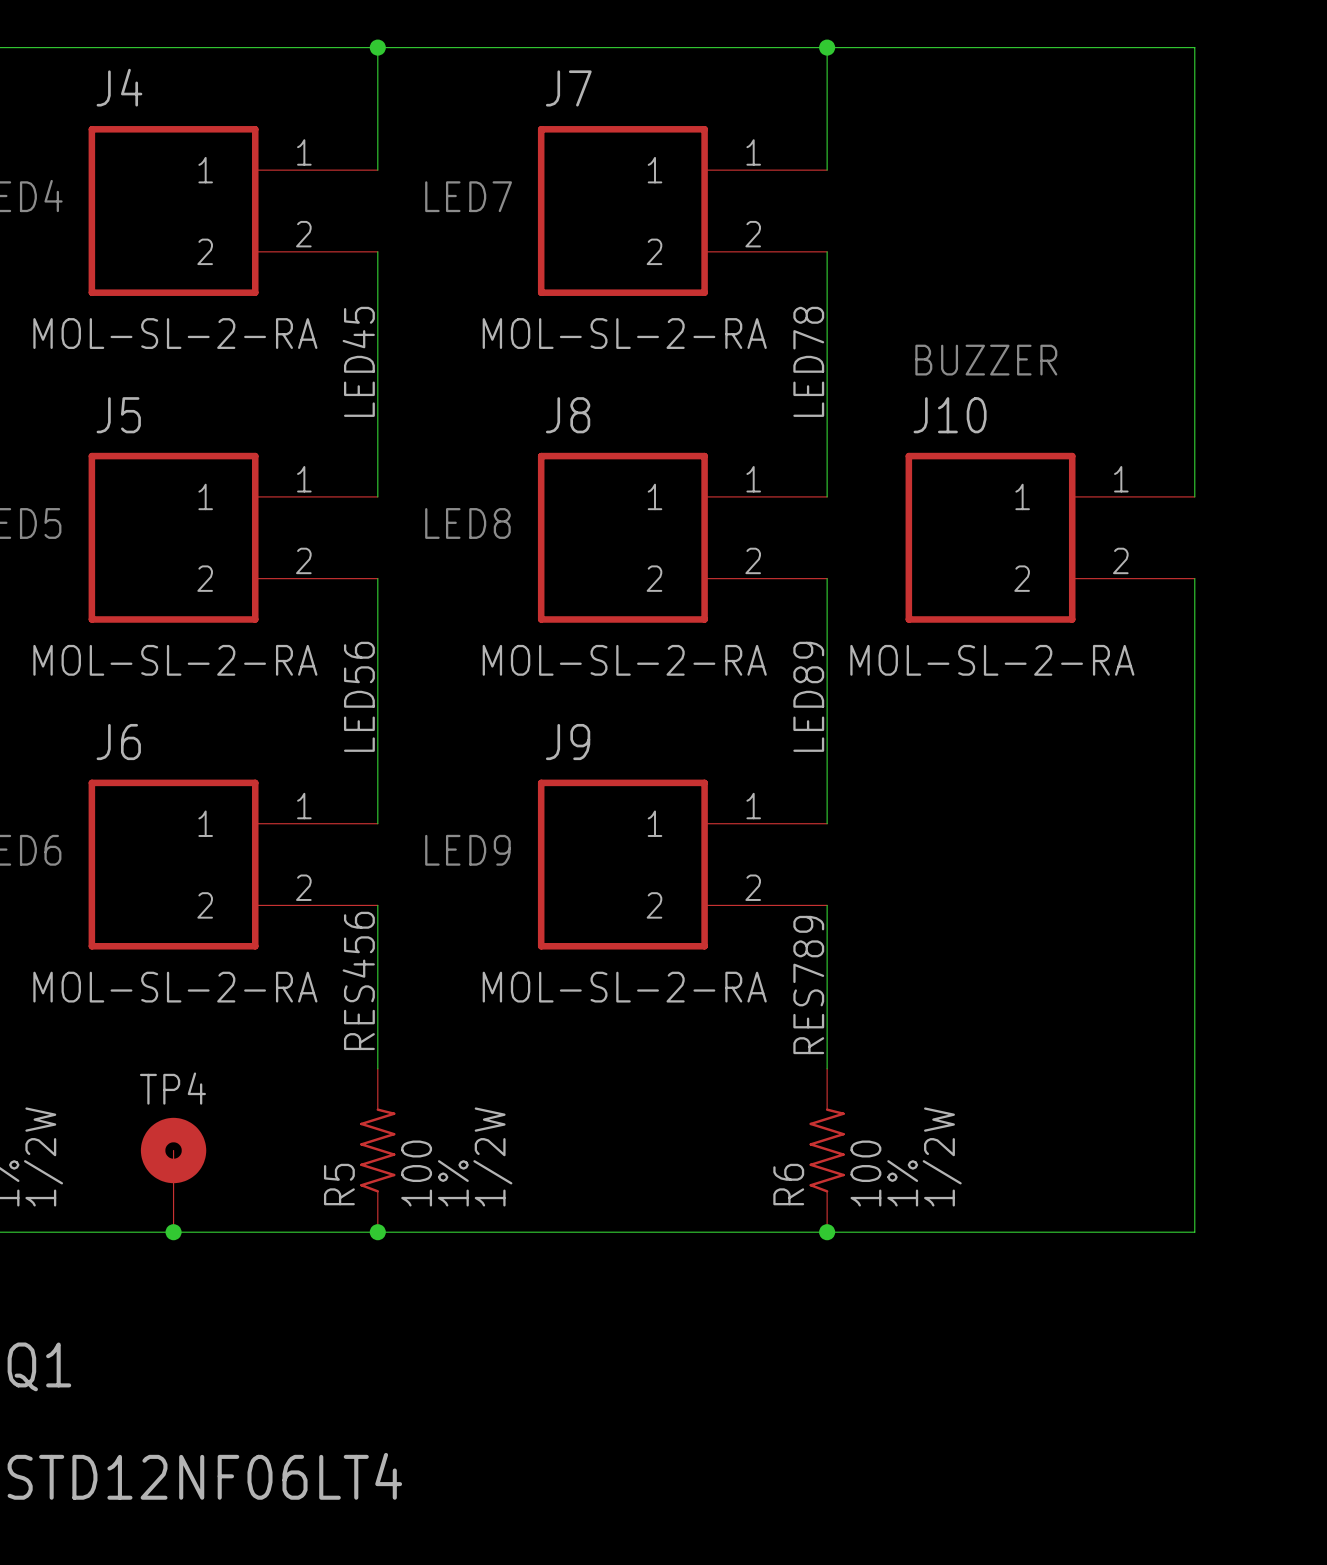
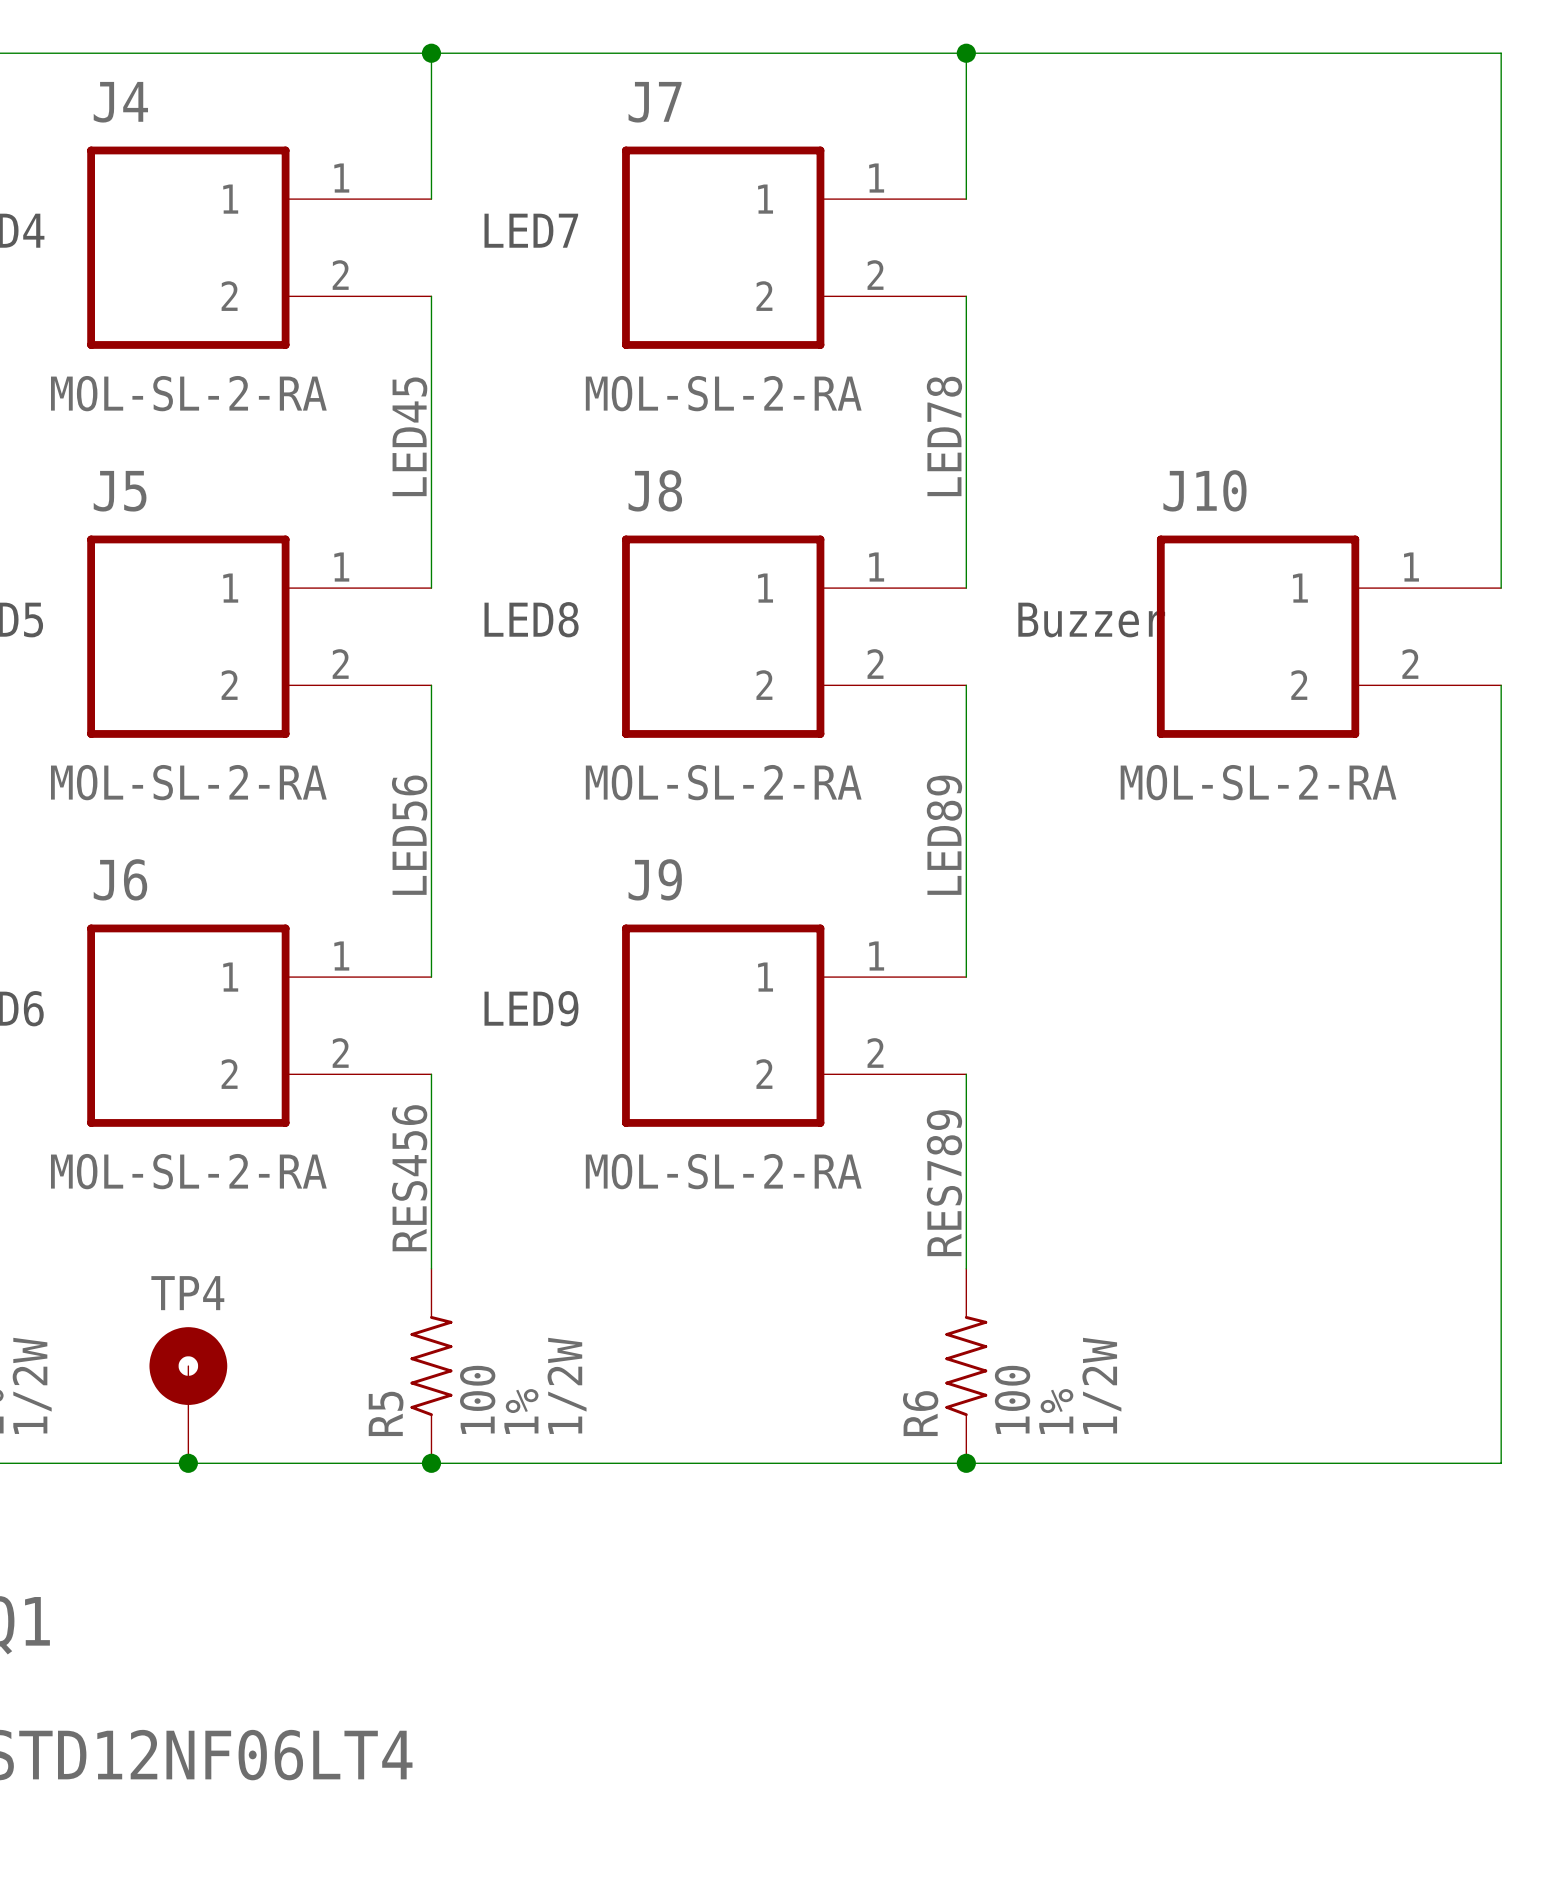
wire: (1194, 47) (1194, 496) -> (1403, 53) (1501, 53) (1501, 588)
text: BUZZER (986, 360) -> none
text: none -> Buzzer (1091, 620)
J10 position: (1050, 537) -> (1329, 636)
wire: (1194, 578) (1194, 1232) -> (1501, 685) (1501, 1463) (1403, 1463)

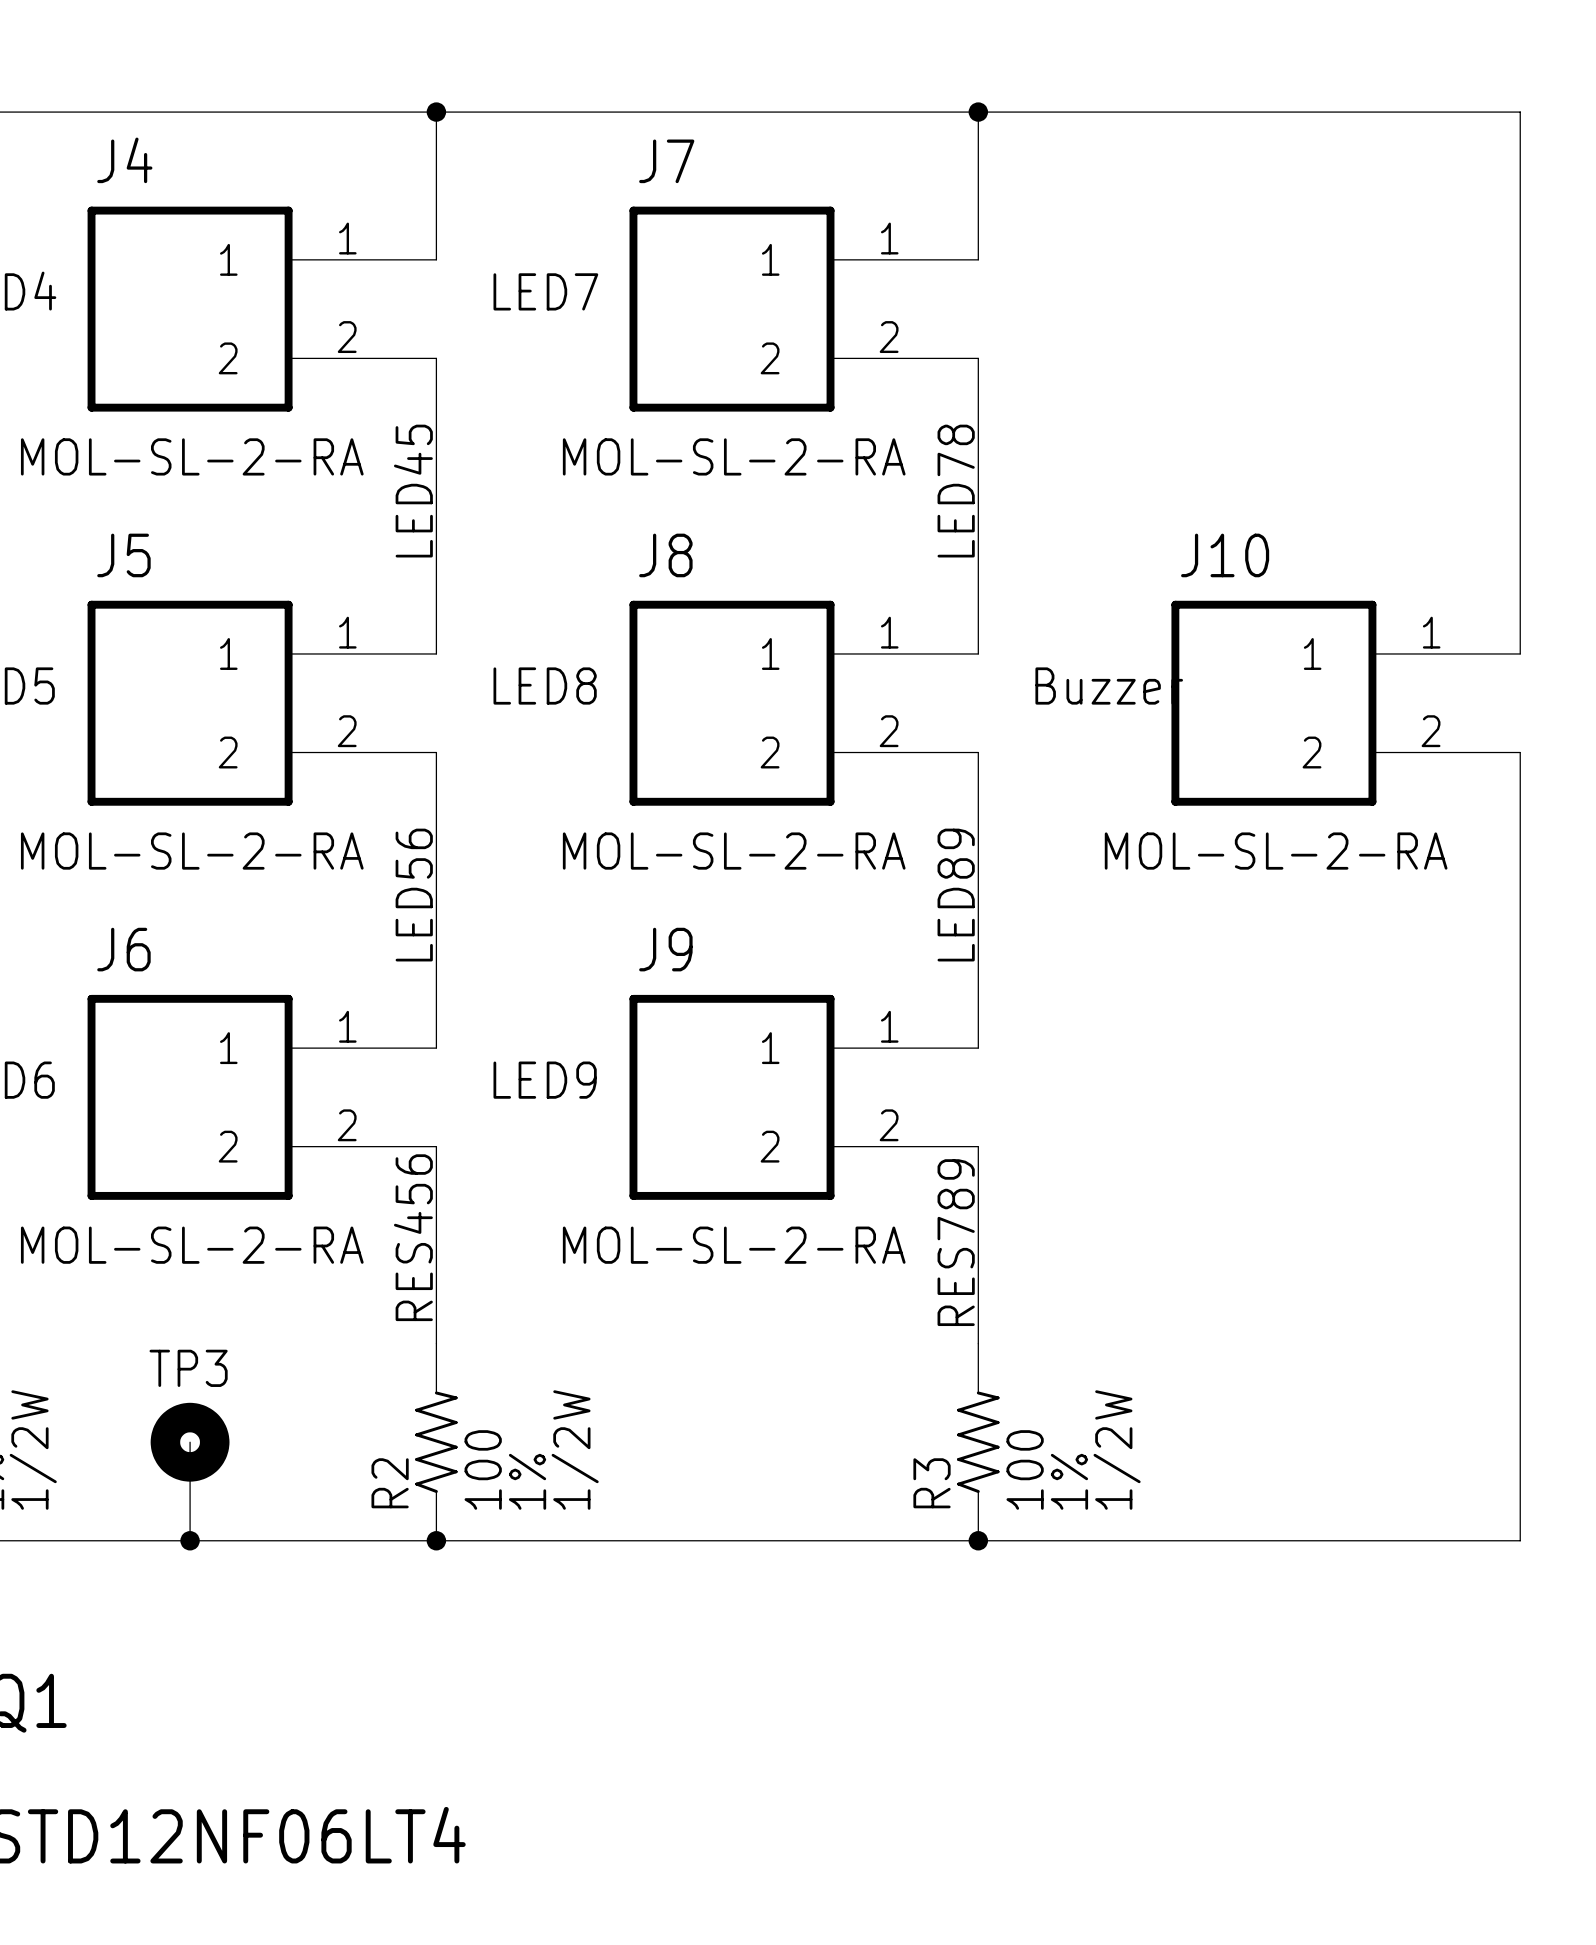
TP4 name: TP4 (187, 1293) -> TP3 (188, 1368)
R5 name: R5 (386, 1413) -> R2 (390, 1483)
R6 name: R6 (920, 1413) -> R3 (932, 1483)

